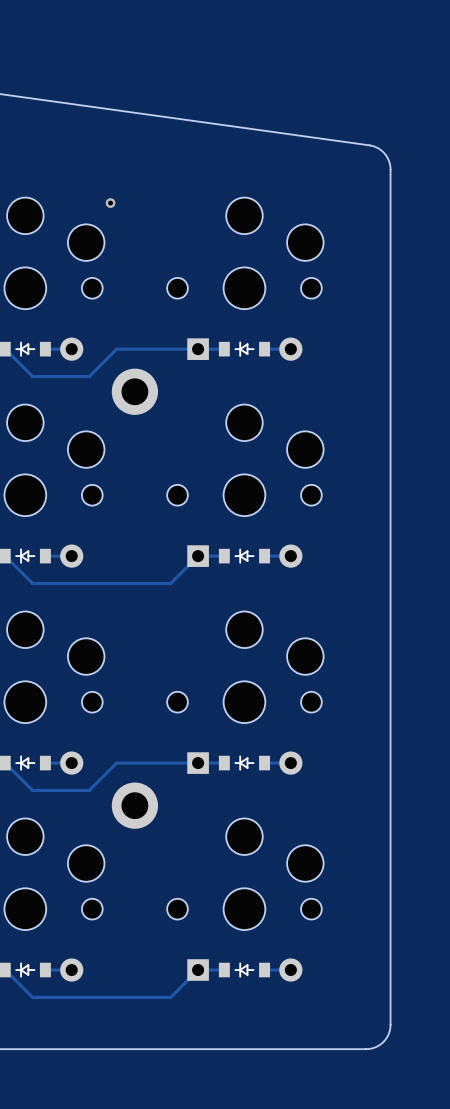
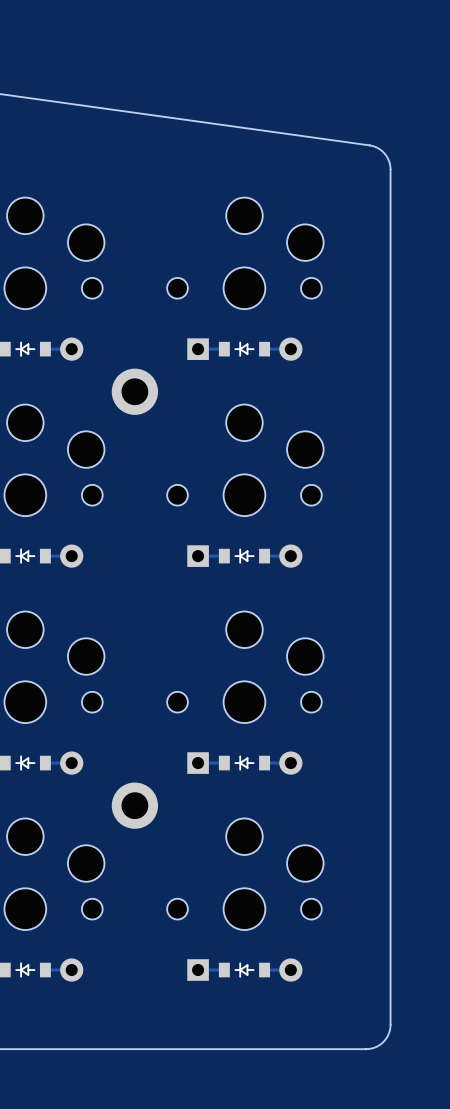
via: (110, 203) -> none
track: (5, 349) (32, 376) (89, 376) (116, 349) (198, 349) -> none
track: (5, 556) (32, 583) (170, 583) (198, 556) -> none
track: (5, 763) (32, 790) (89, 790) (116, 763) (198, 763) -> none
track: (5, 970) (32, 997) (170, 997) (198, 970) -> none

